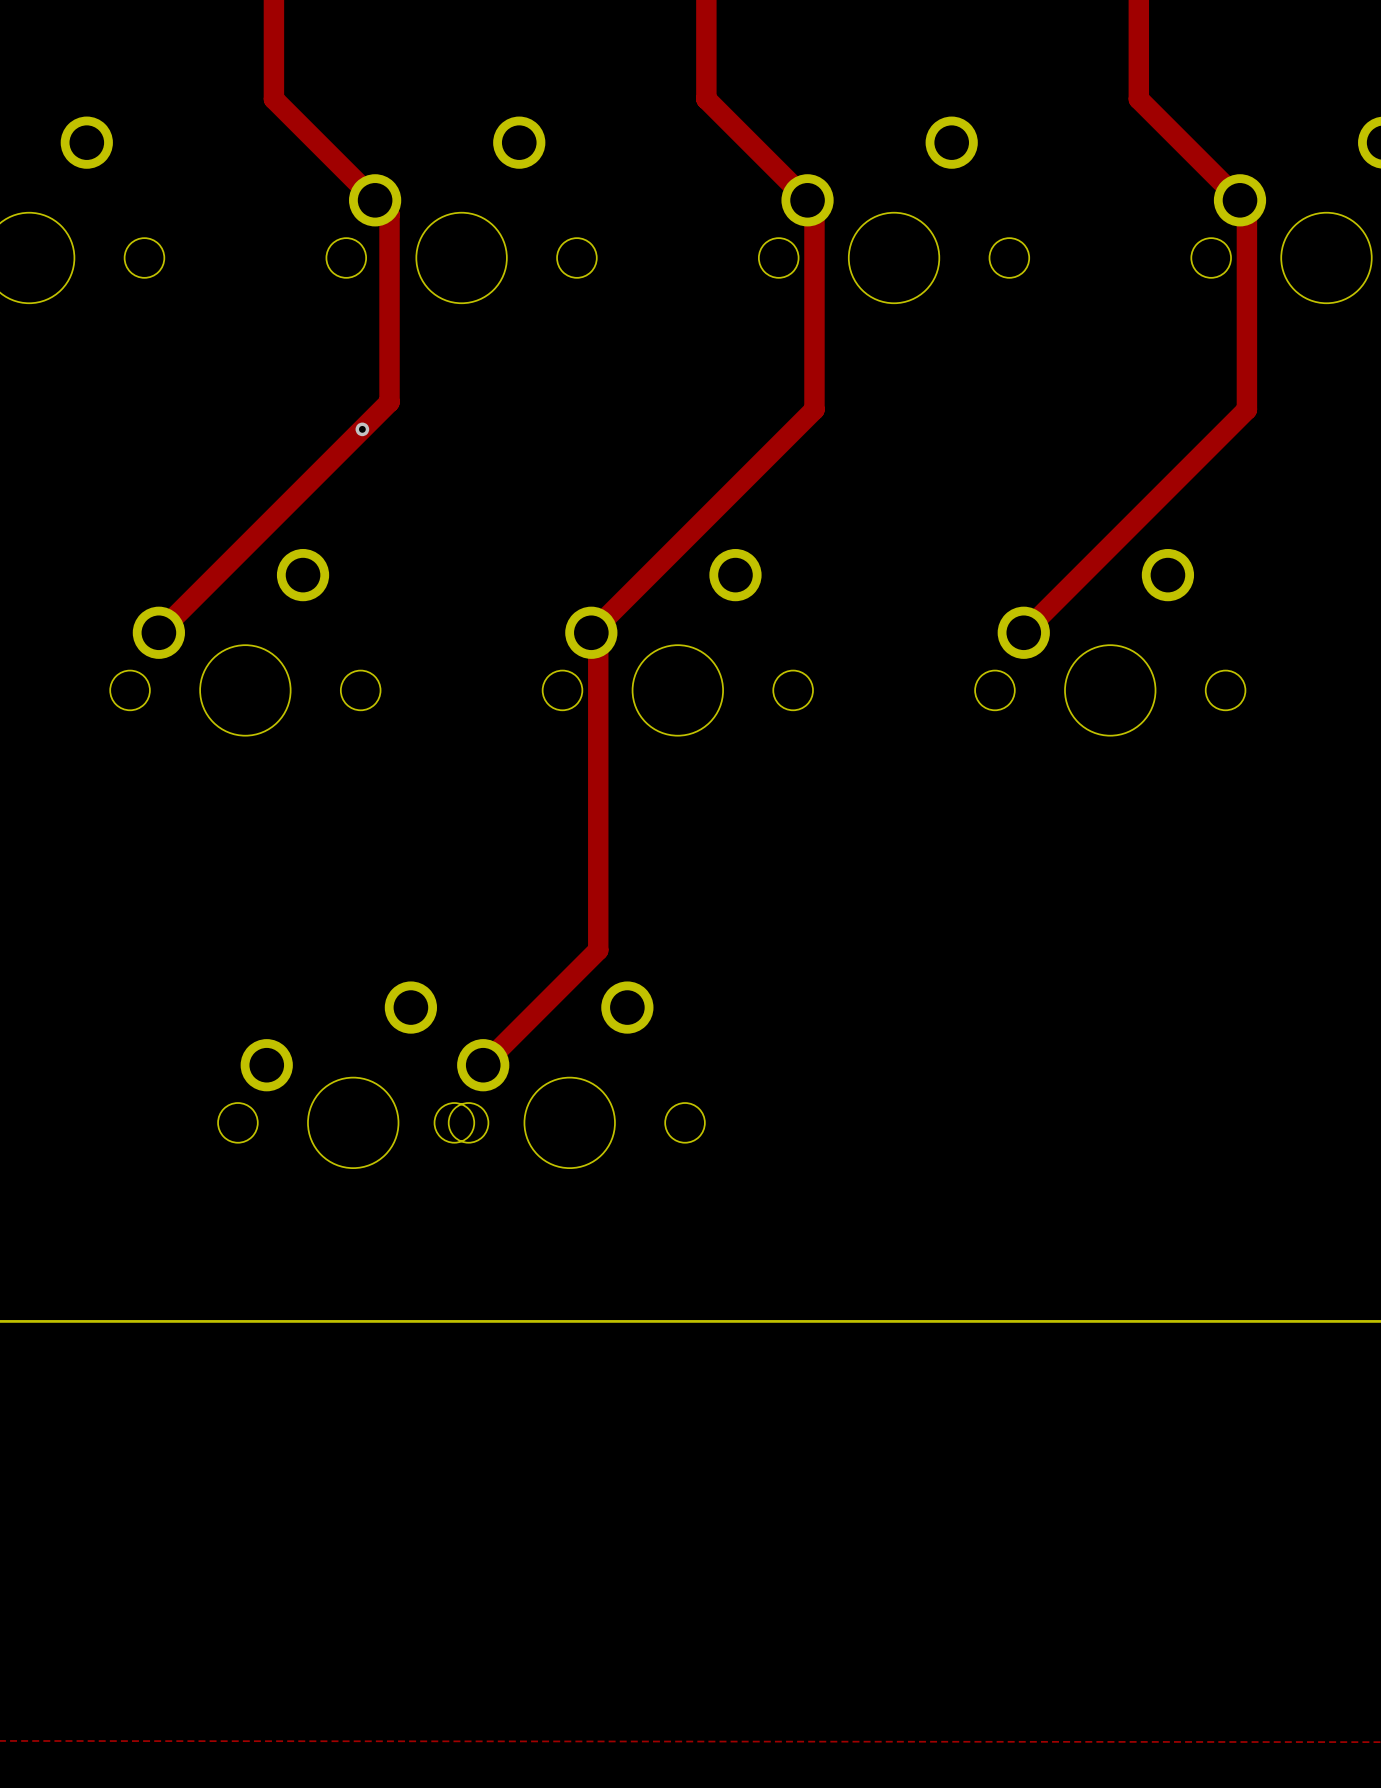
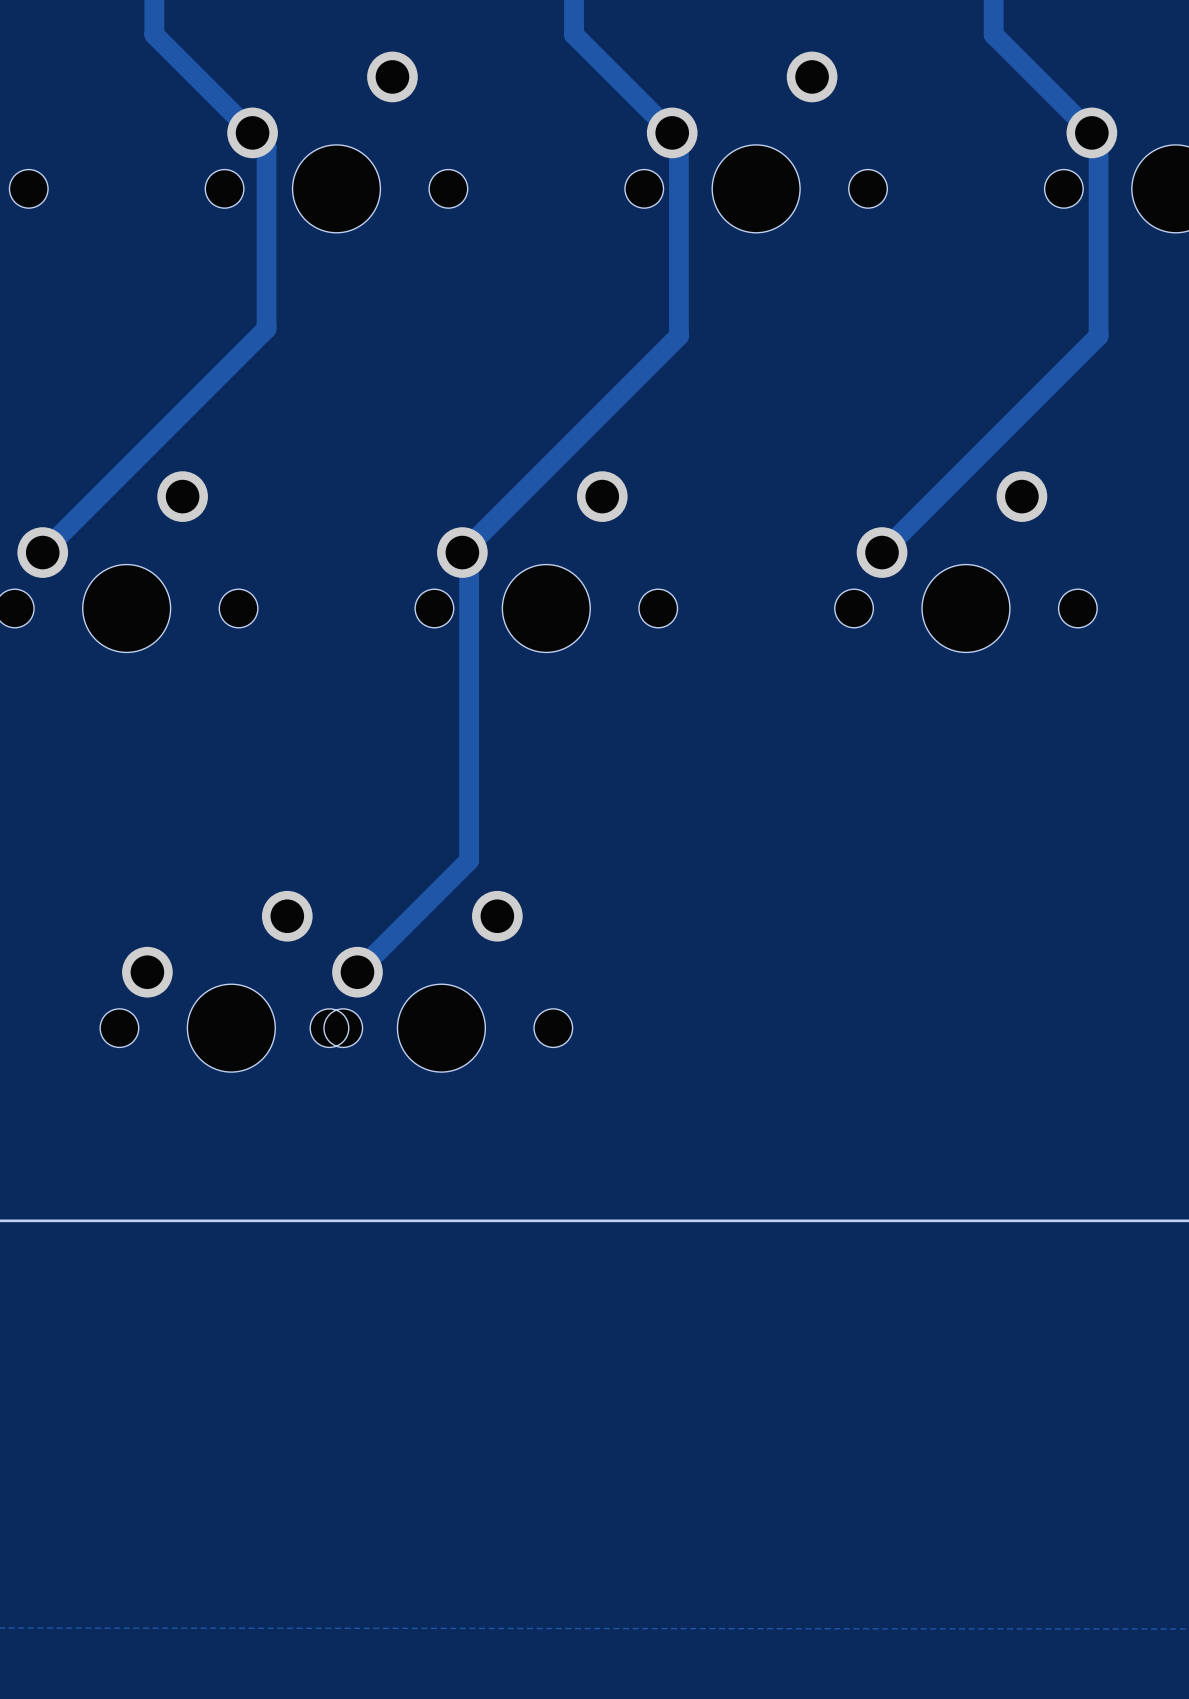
via: (362, 429) -> none

